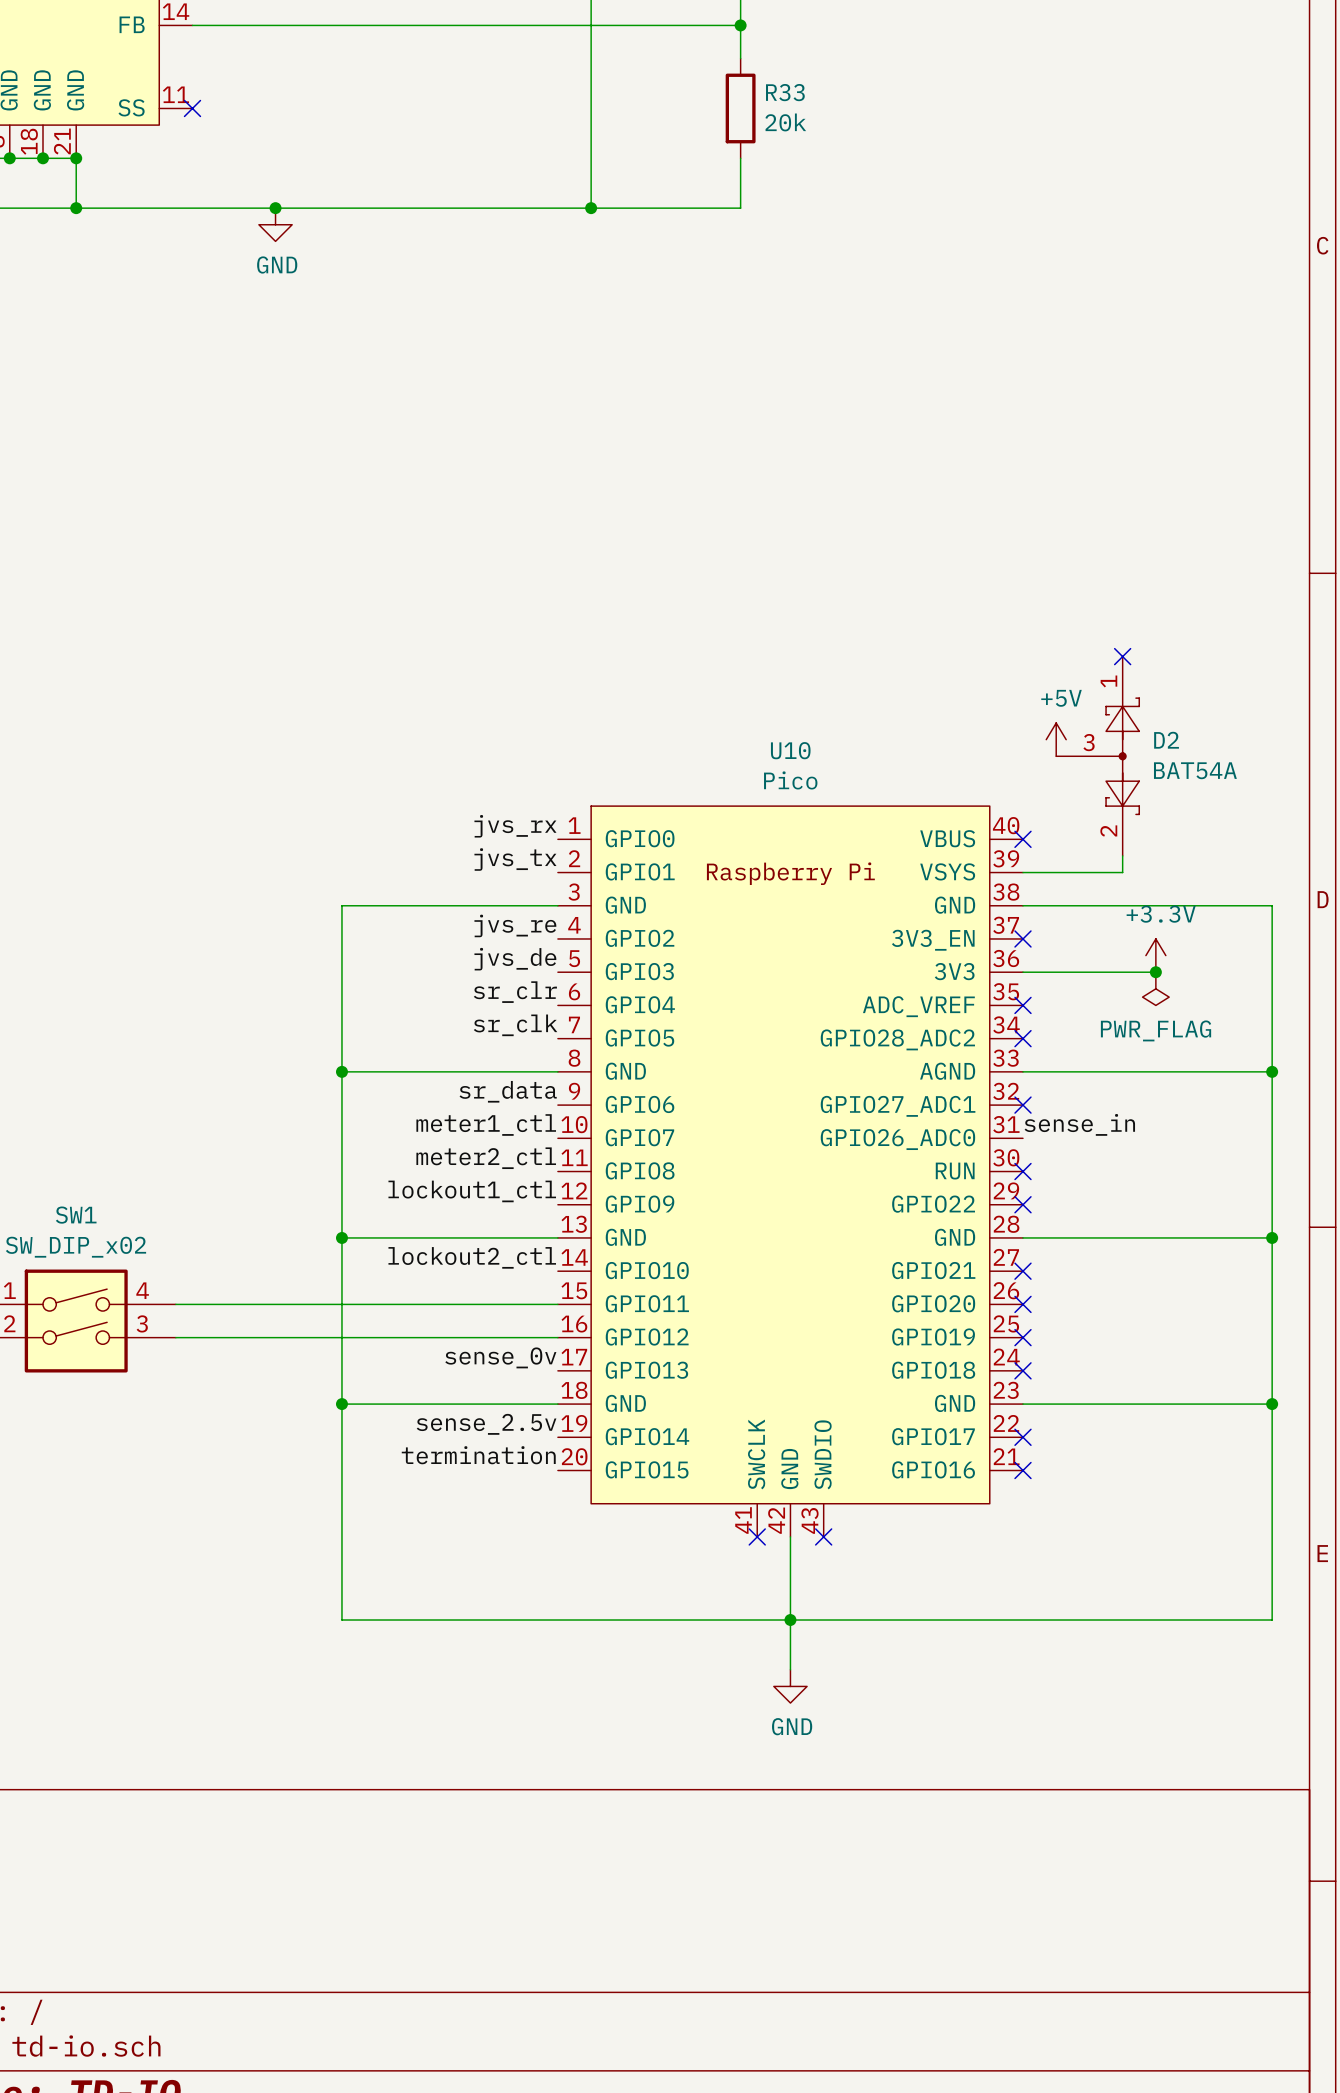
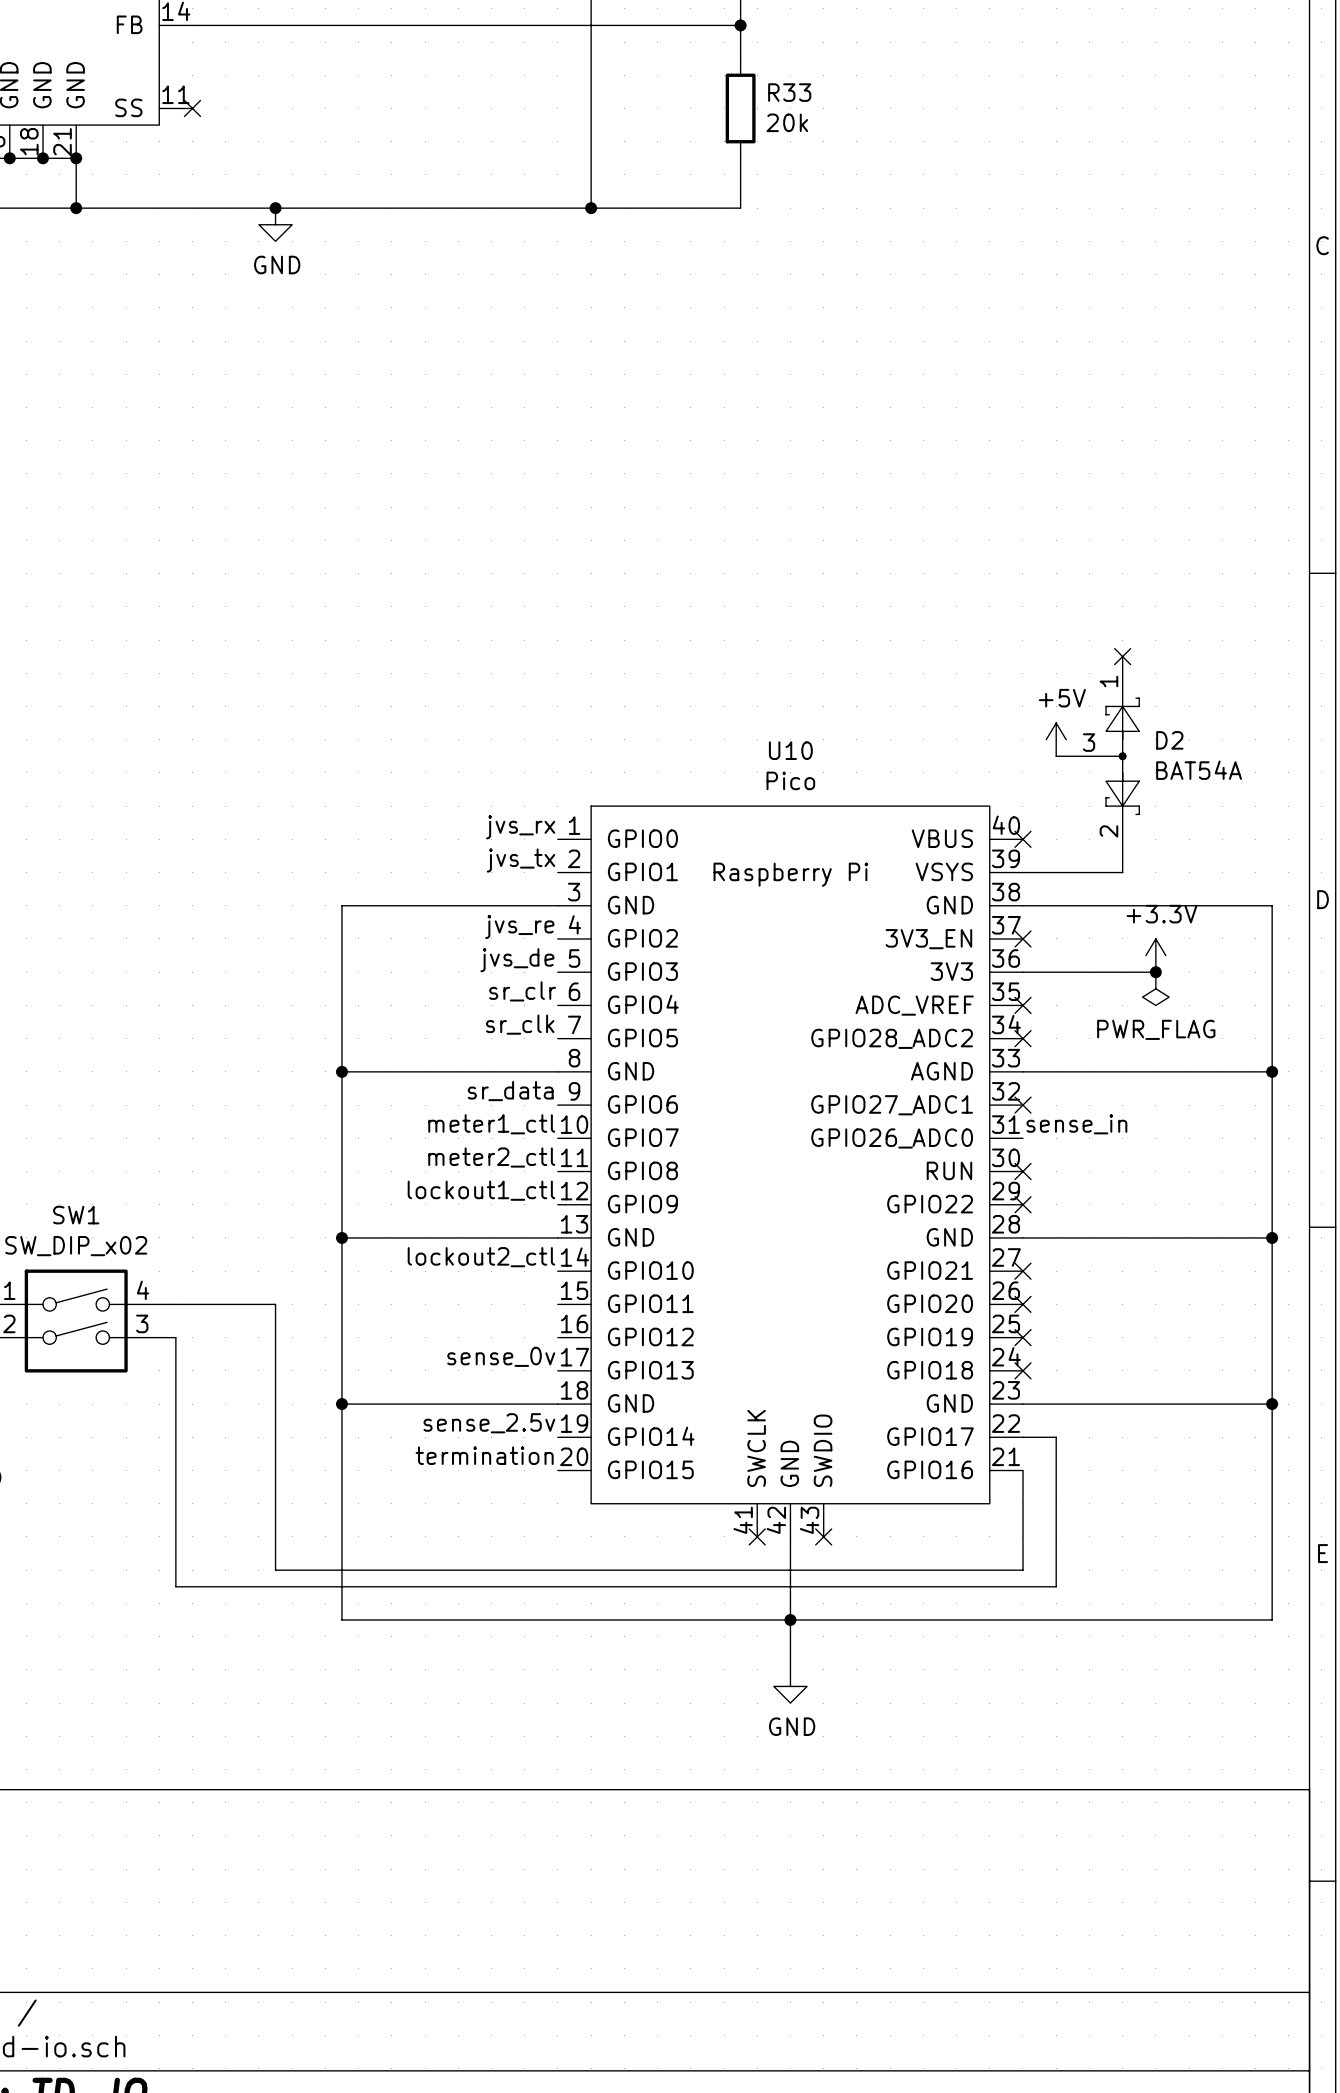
wire: (275, 1304) (557, 1304) -> (275, 1304) (275, 1570) (1022, 1570) (1022, 1470)
wire: (175, 1337) (557, 1337) -> (175, 1337) (175, 1586) (1056, 1586) (1056, 1437) (1022, 1437)
no-connect mark: (1022, 1437) -> none
no-connect mark: (1022, 1470) -> none

